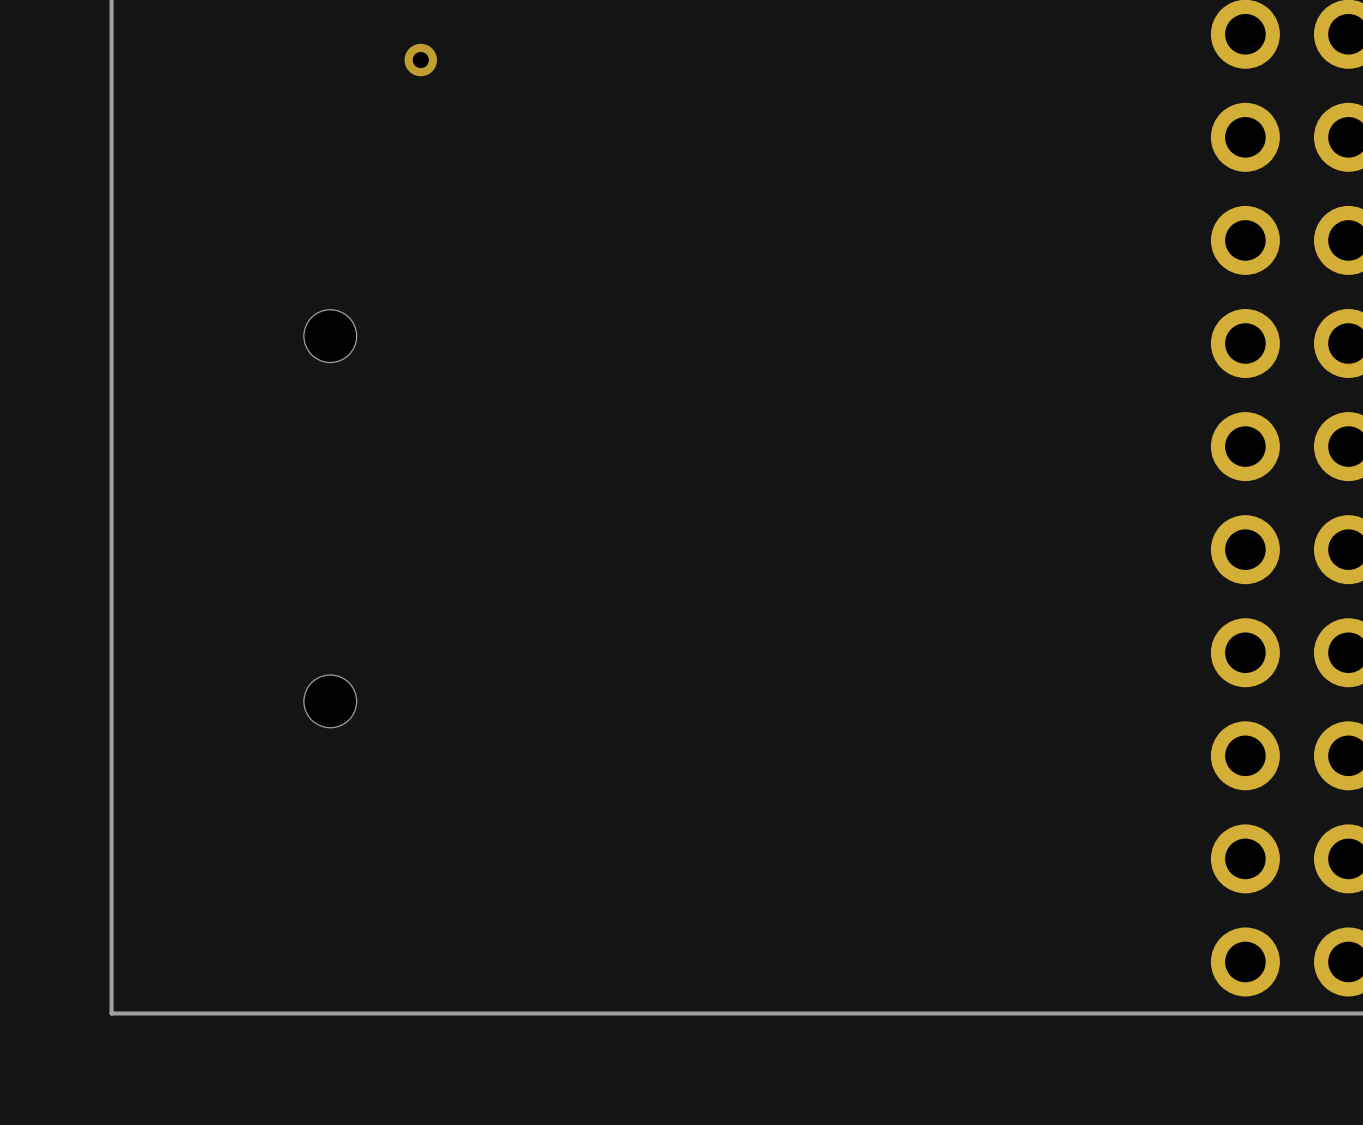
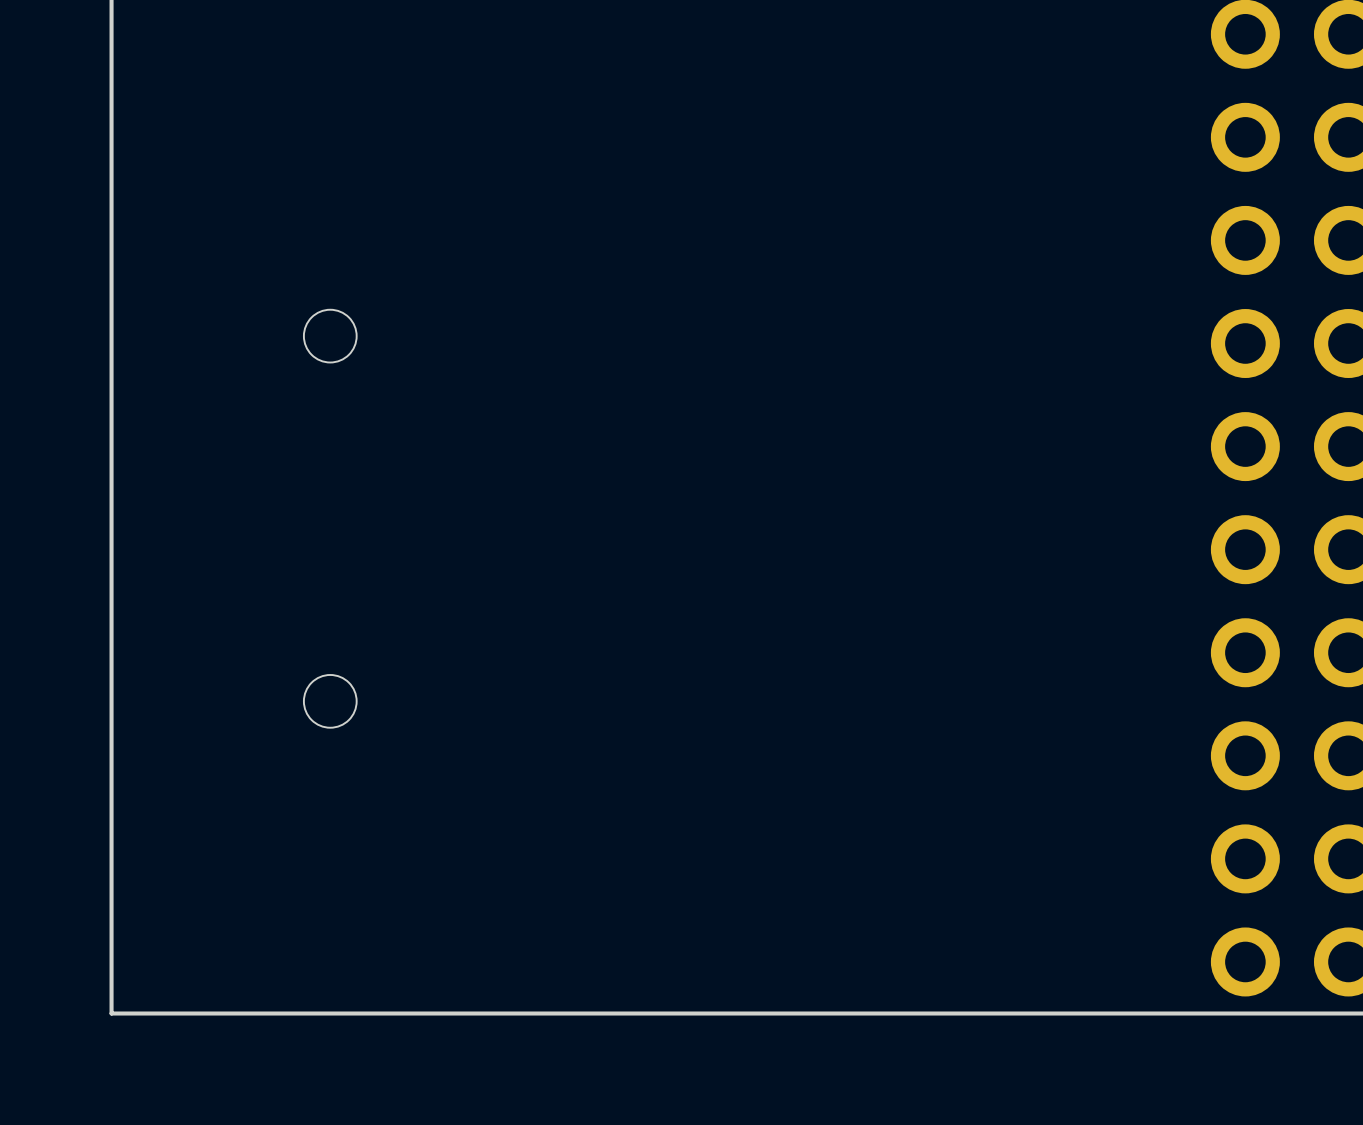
via: (420, 60) -> none

